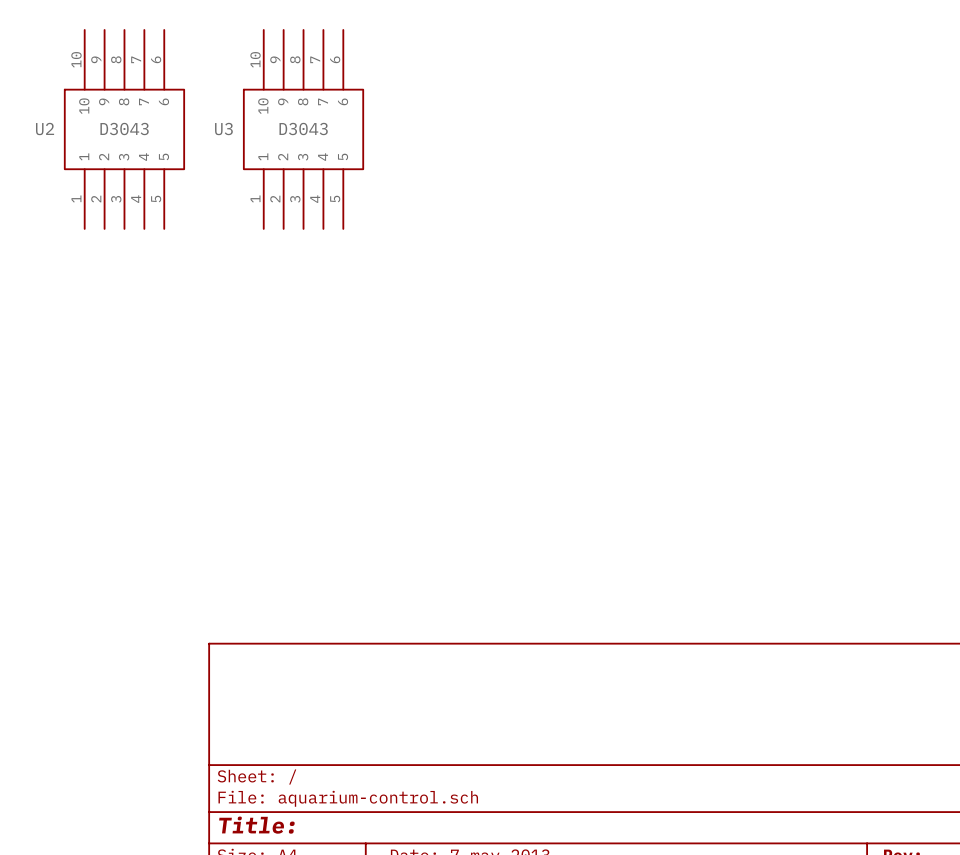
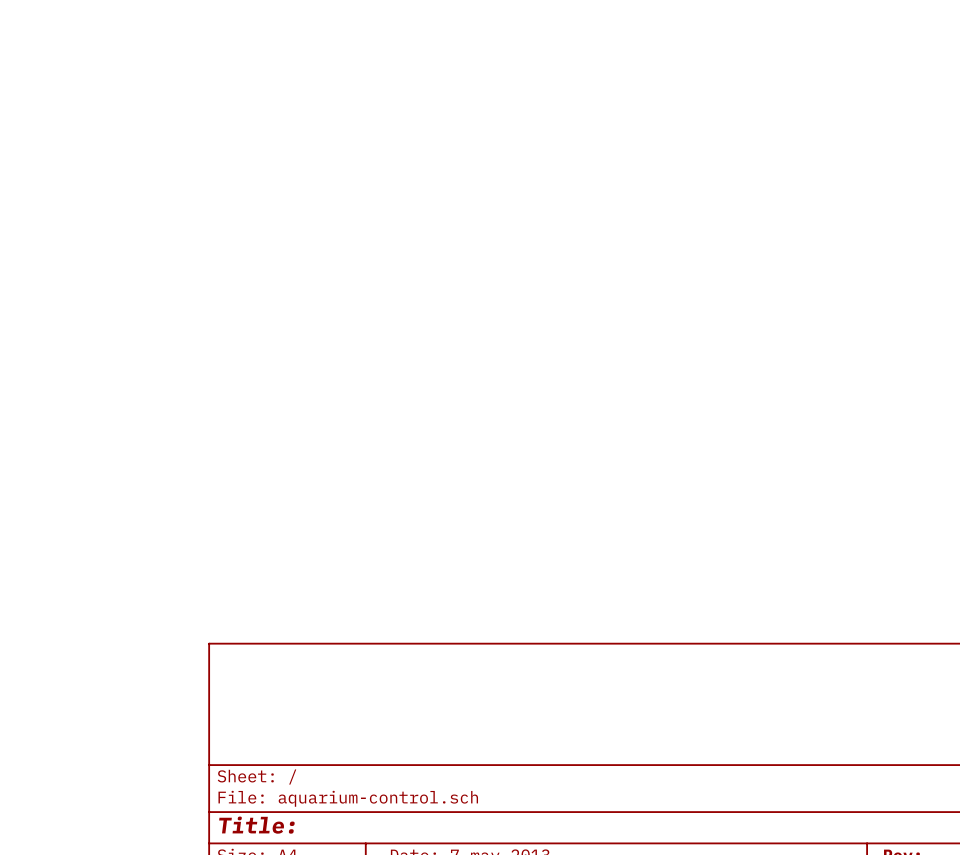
U2: D3043 (124, 129) -> none
U3: D3043 (303, 129) -> none

